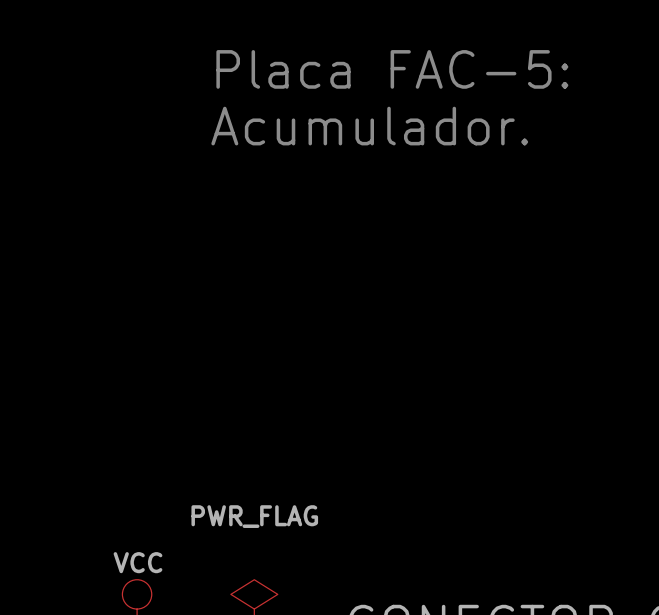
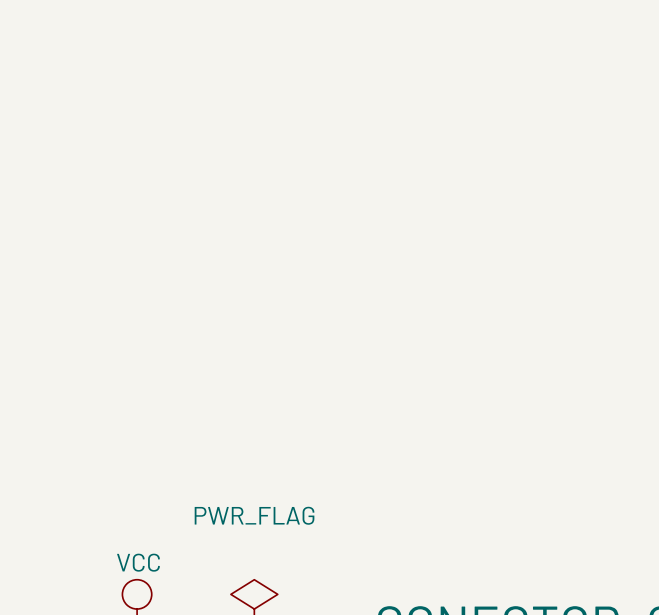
text: Placa FAC-5: (392, 69) -> none
text: Acumulador. (369, 126) -> none

